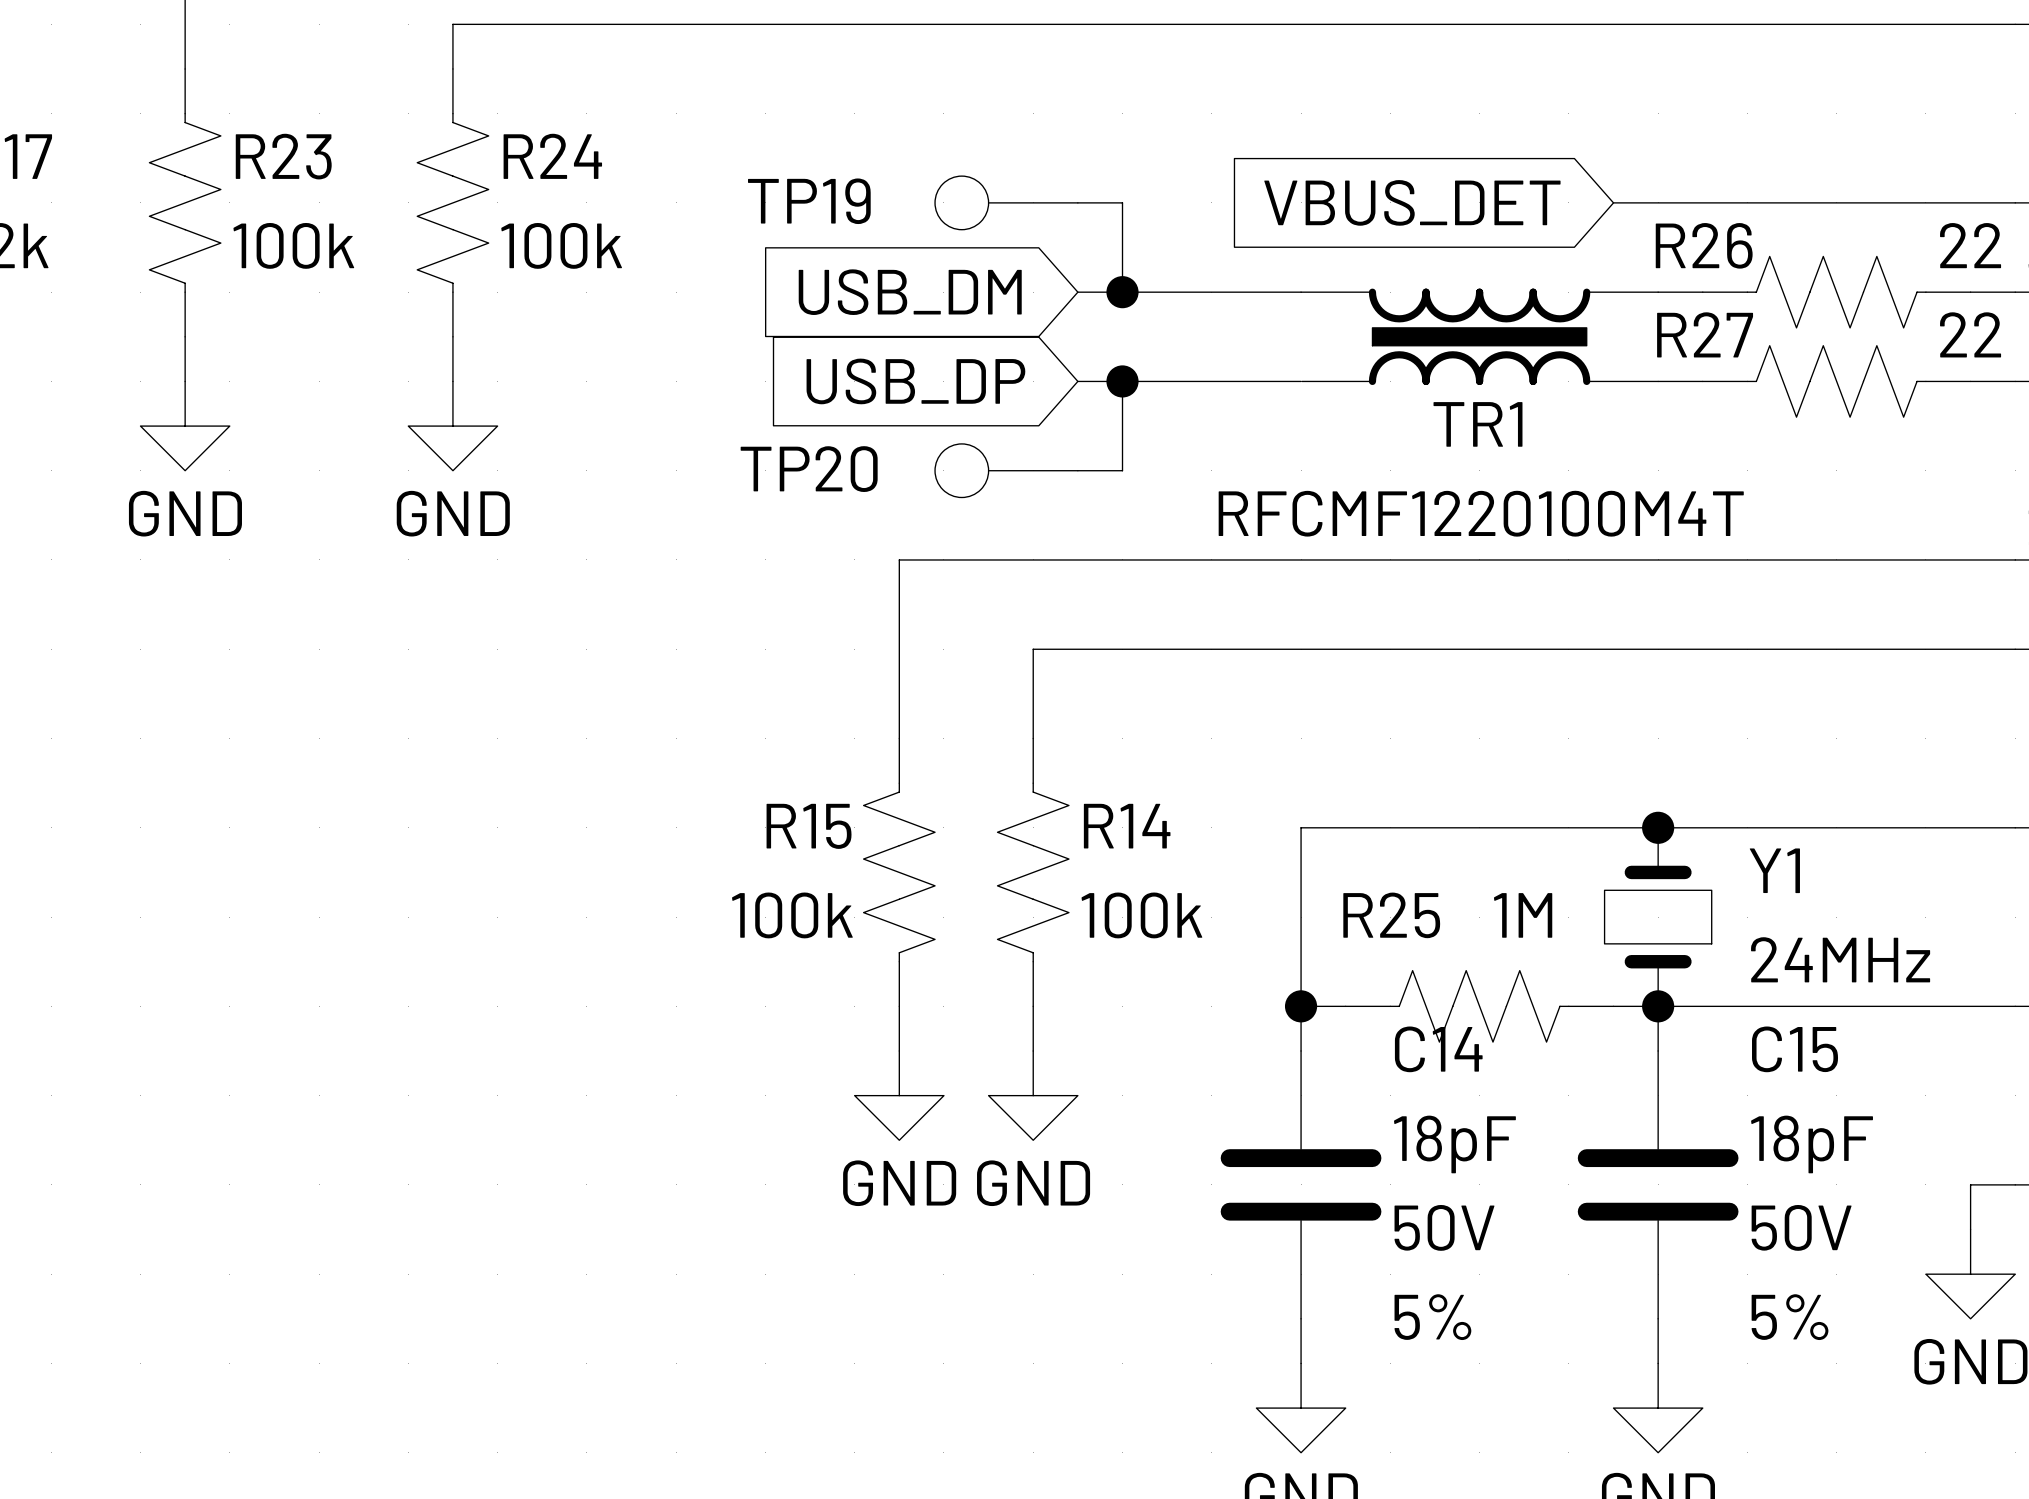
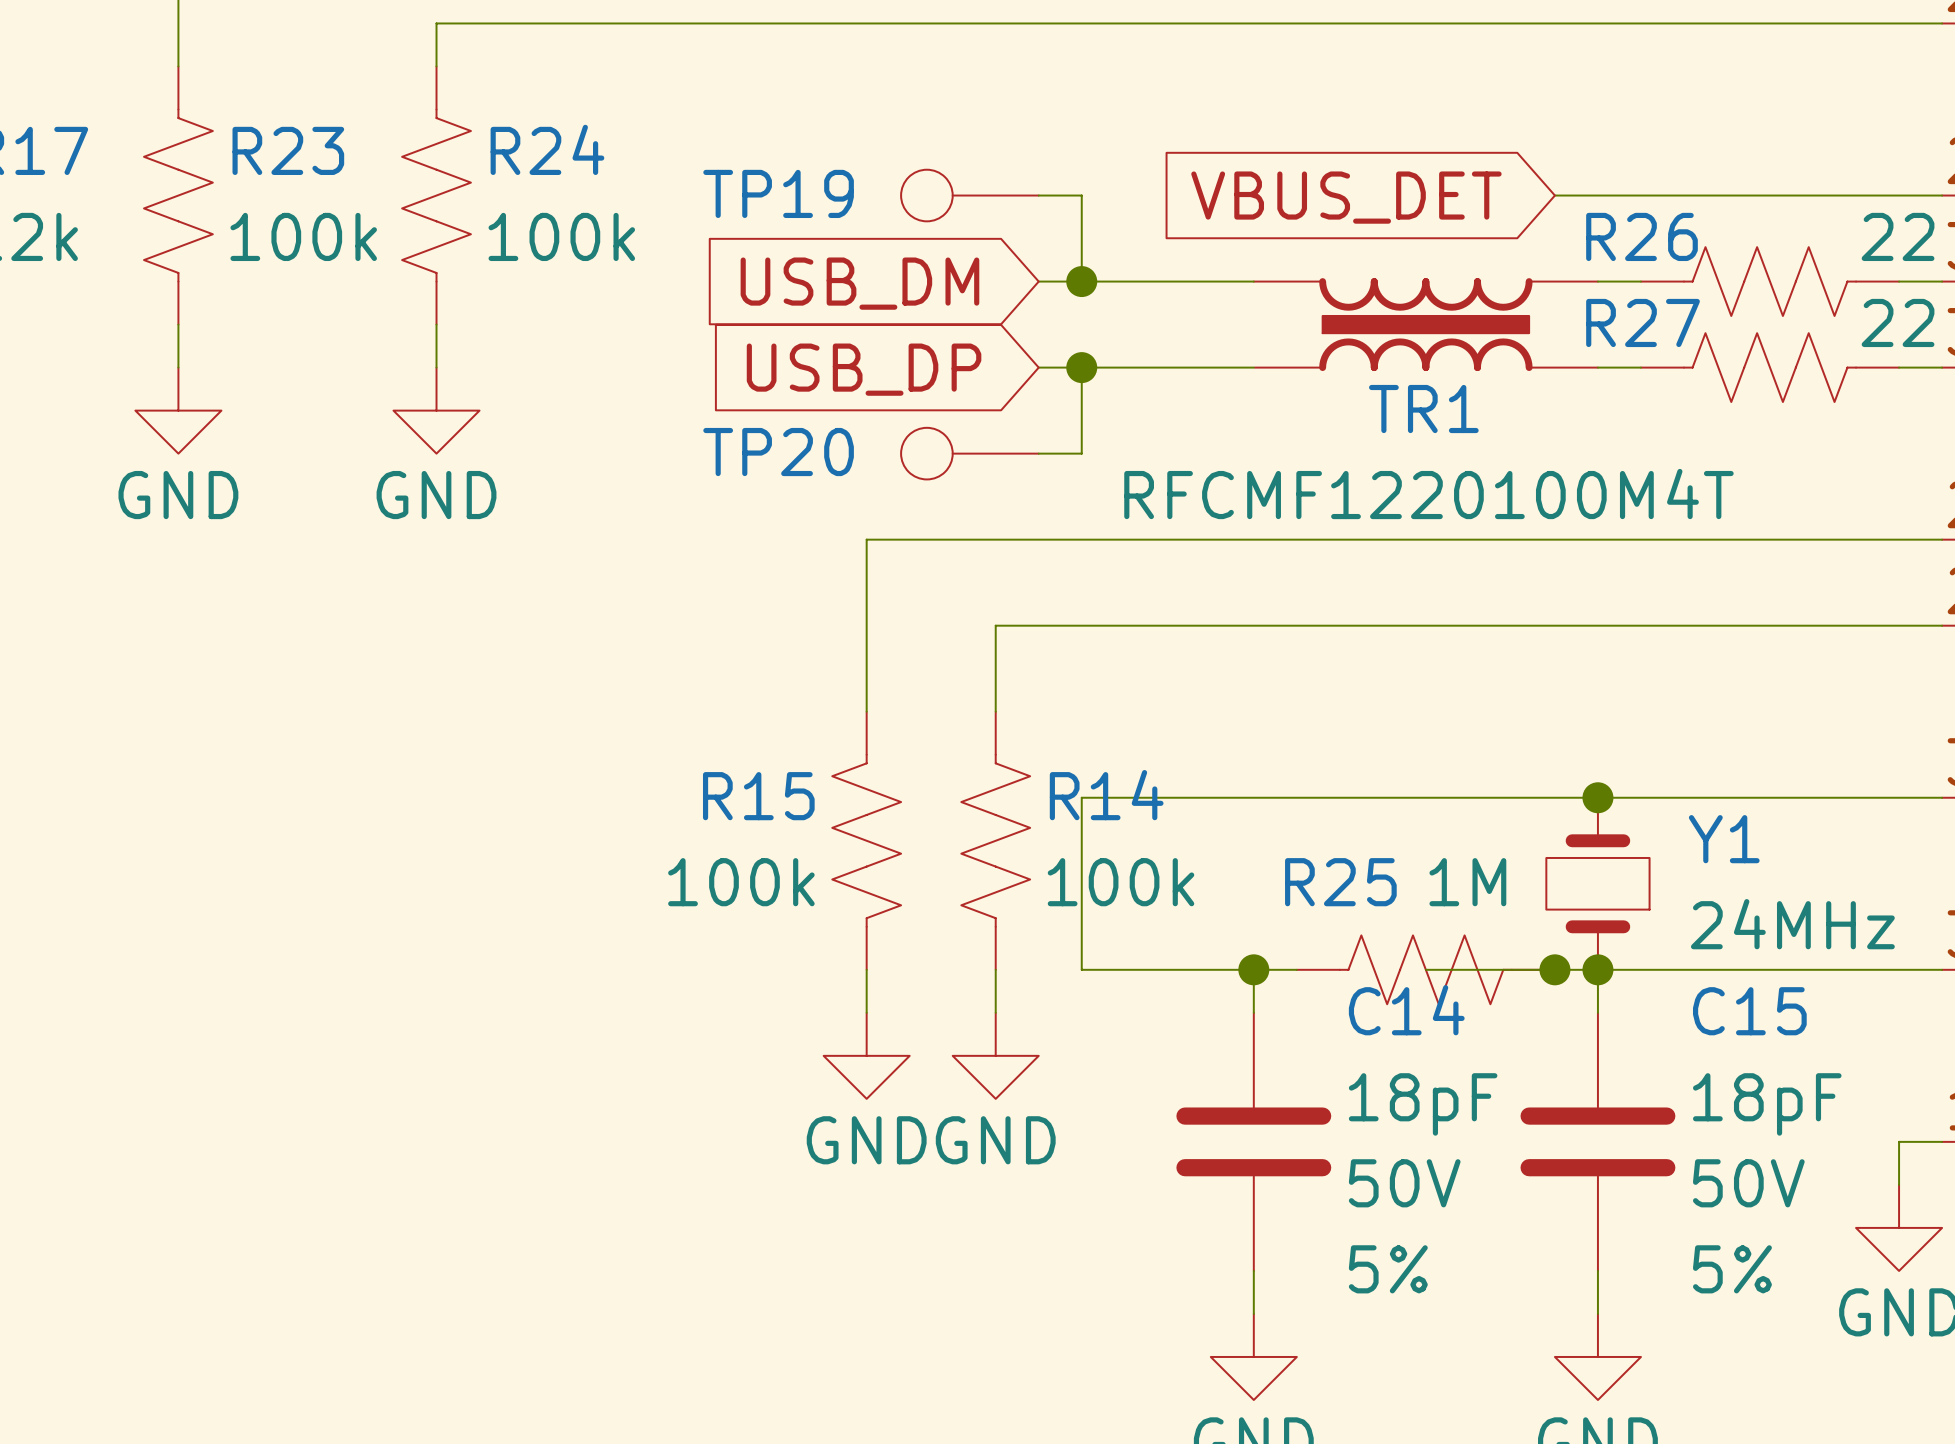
wire: (1301, 827) (1301, 1006) -> (1253, 797) (1081, 797) (1081, 969) (1253, 969)
wire: none -> (1425, 969) (1554, 969)
junction: none -> (1554, 969)

